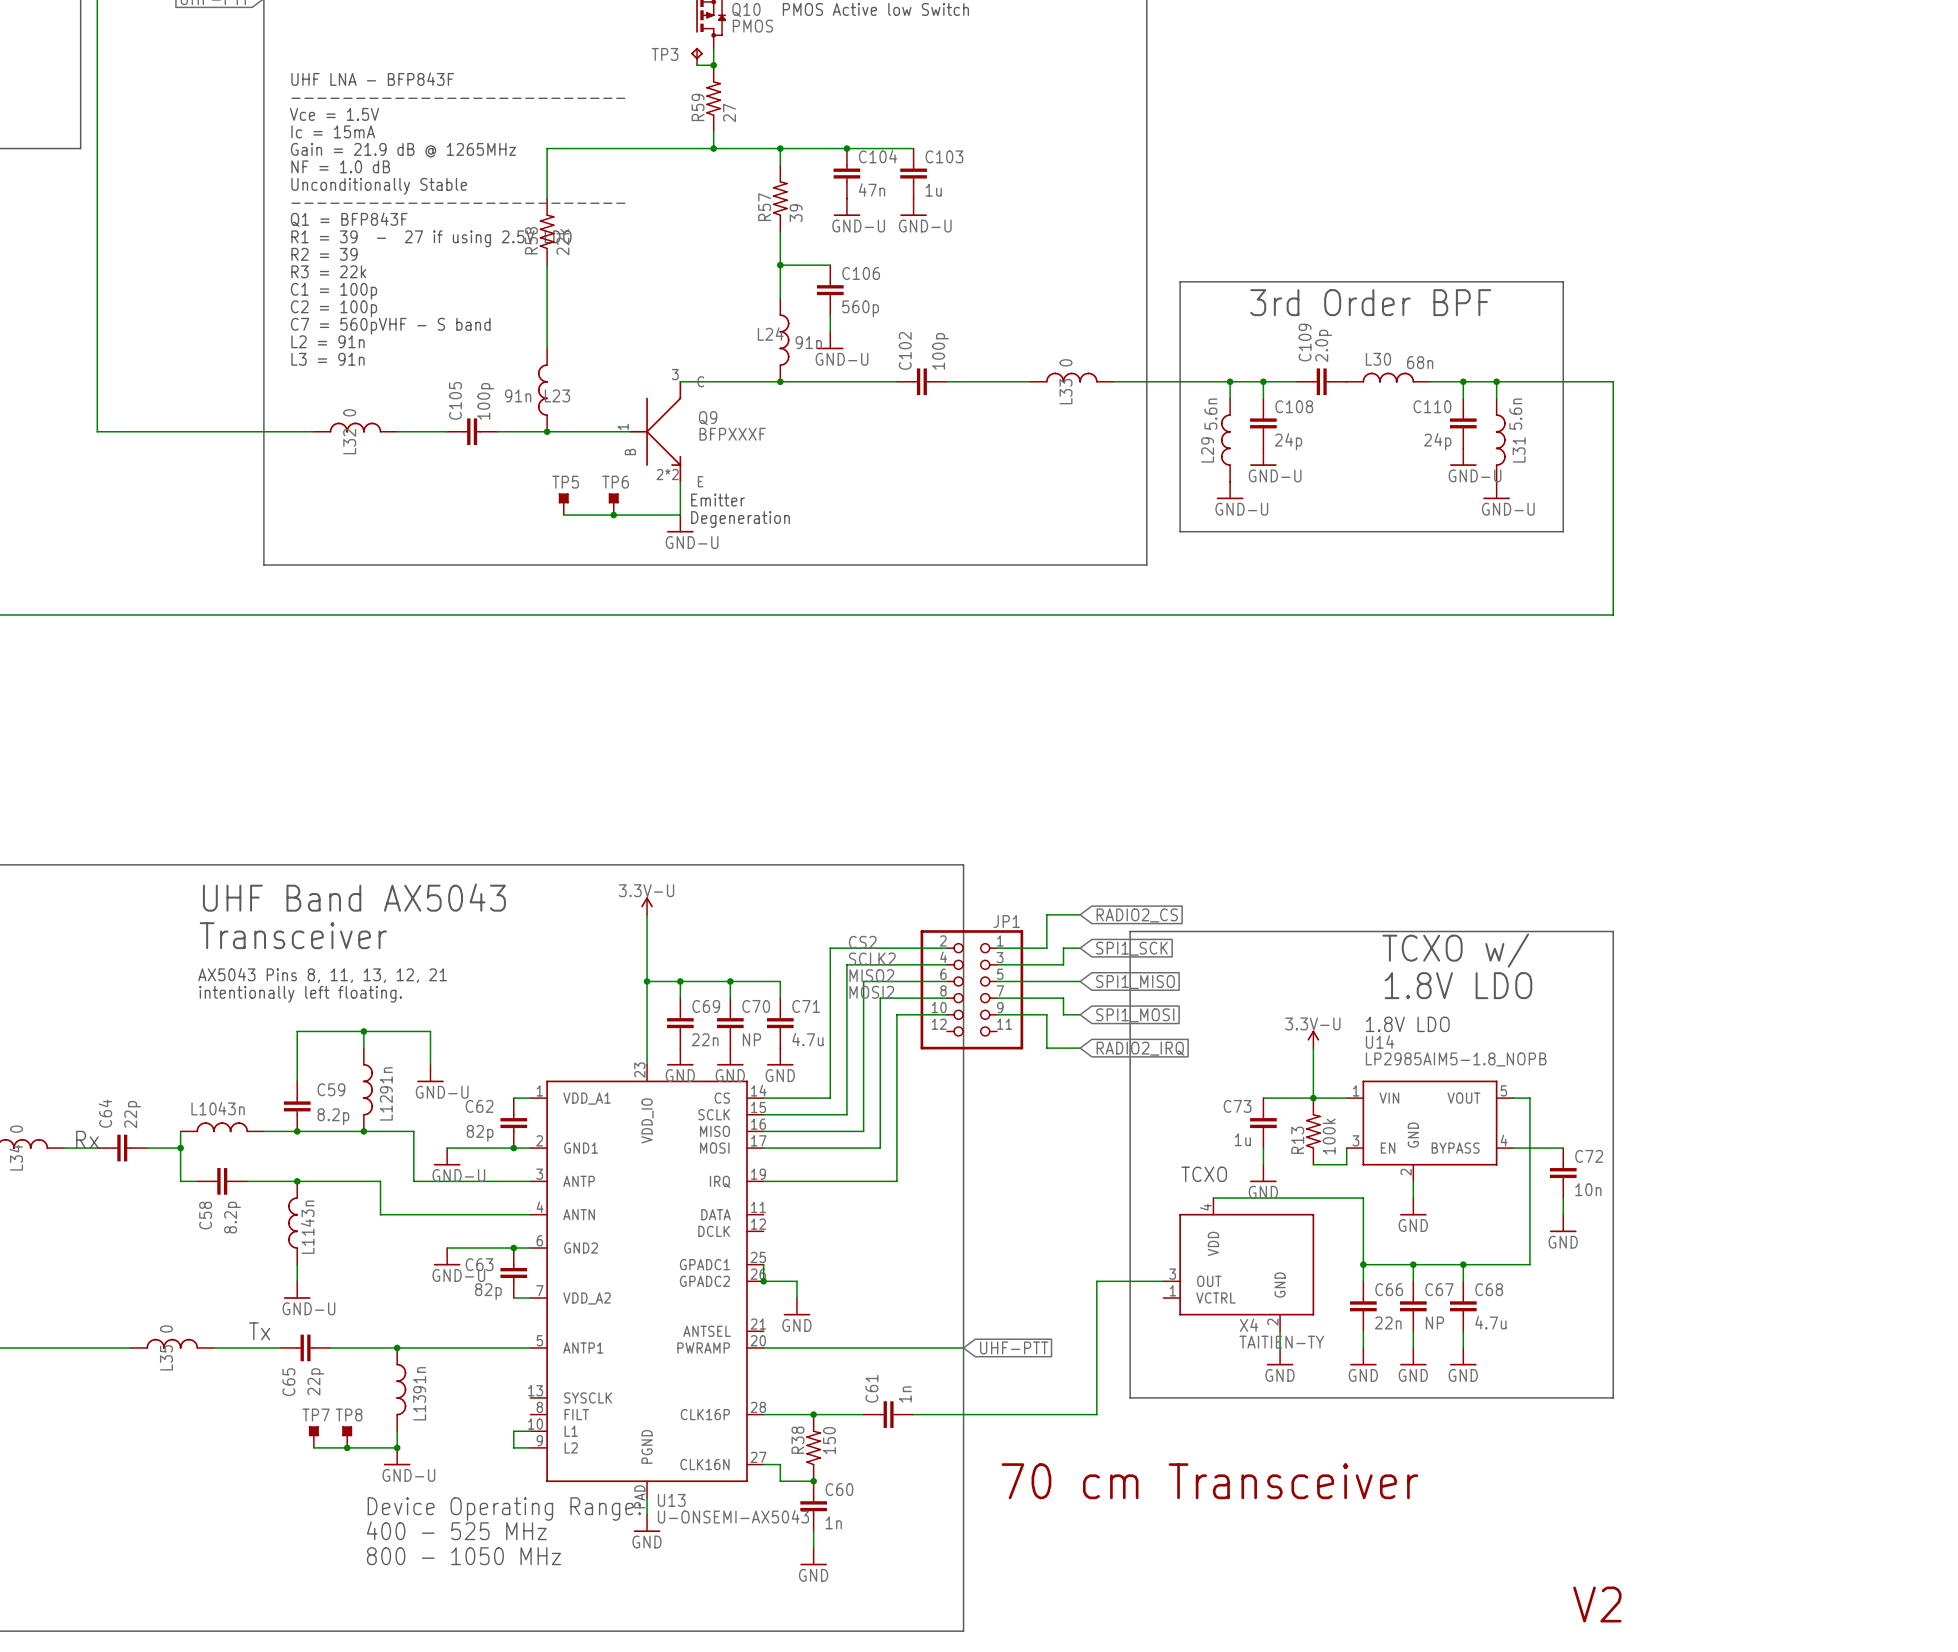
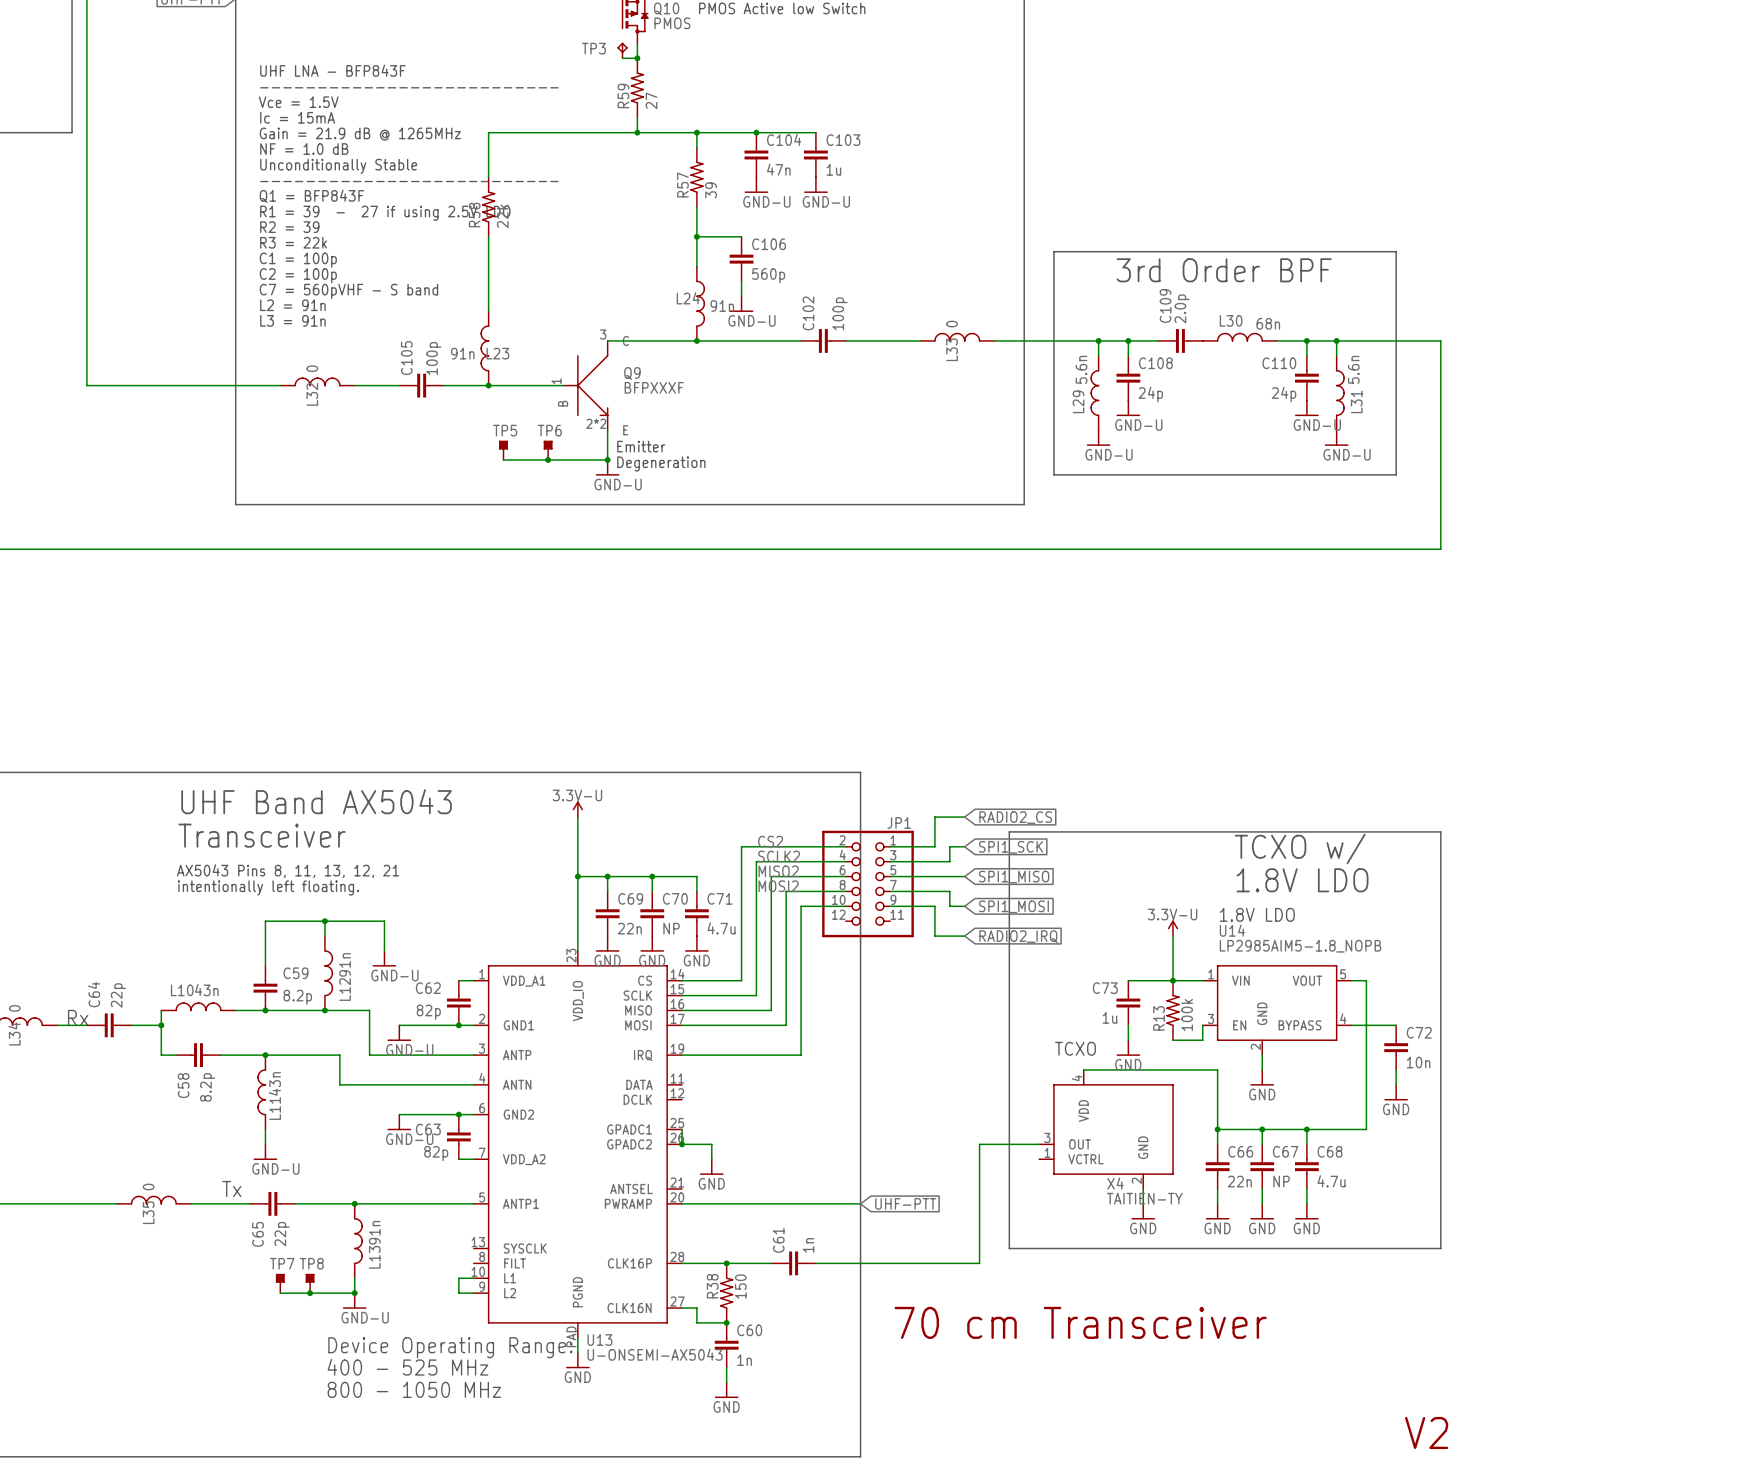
junction: none -> (607, 459)

